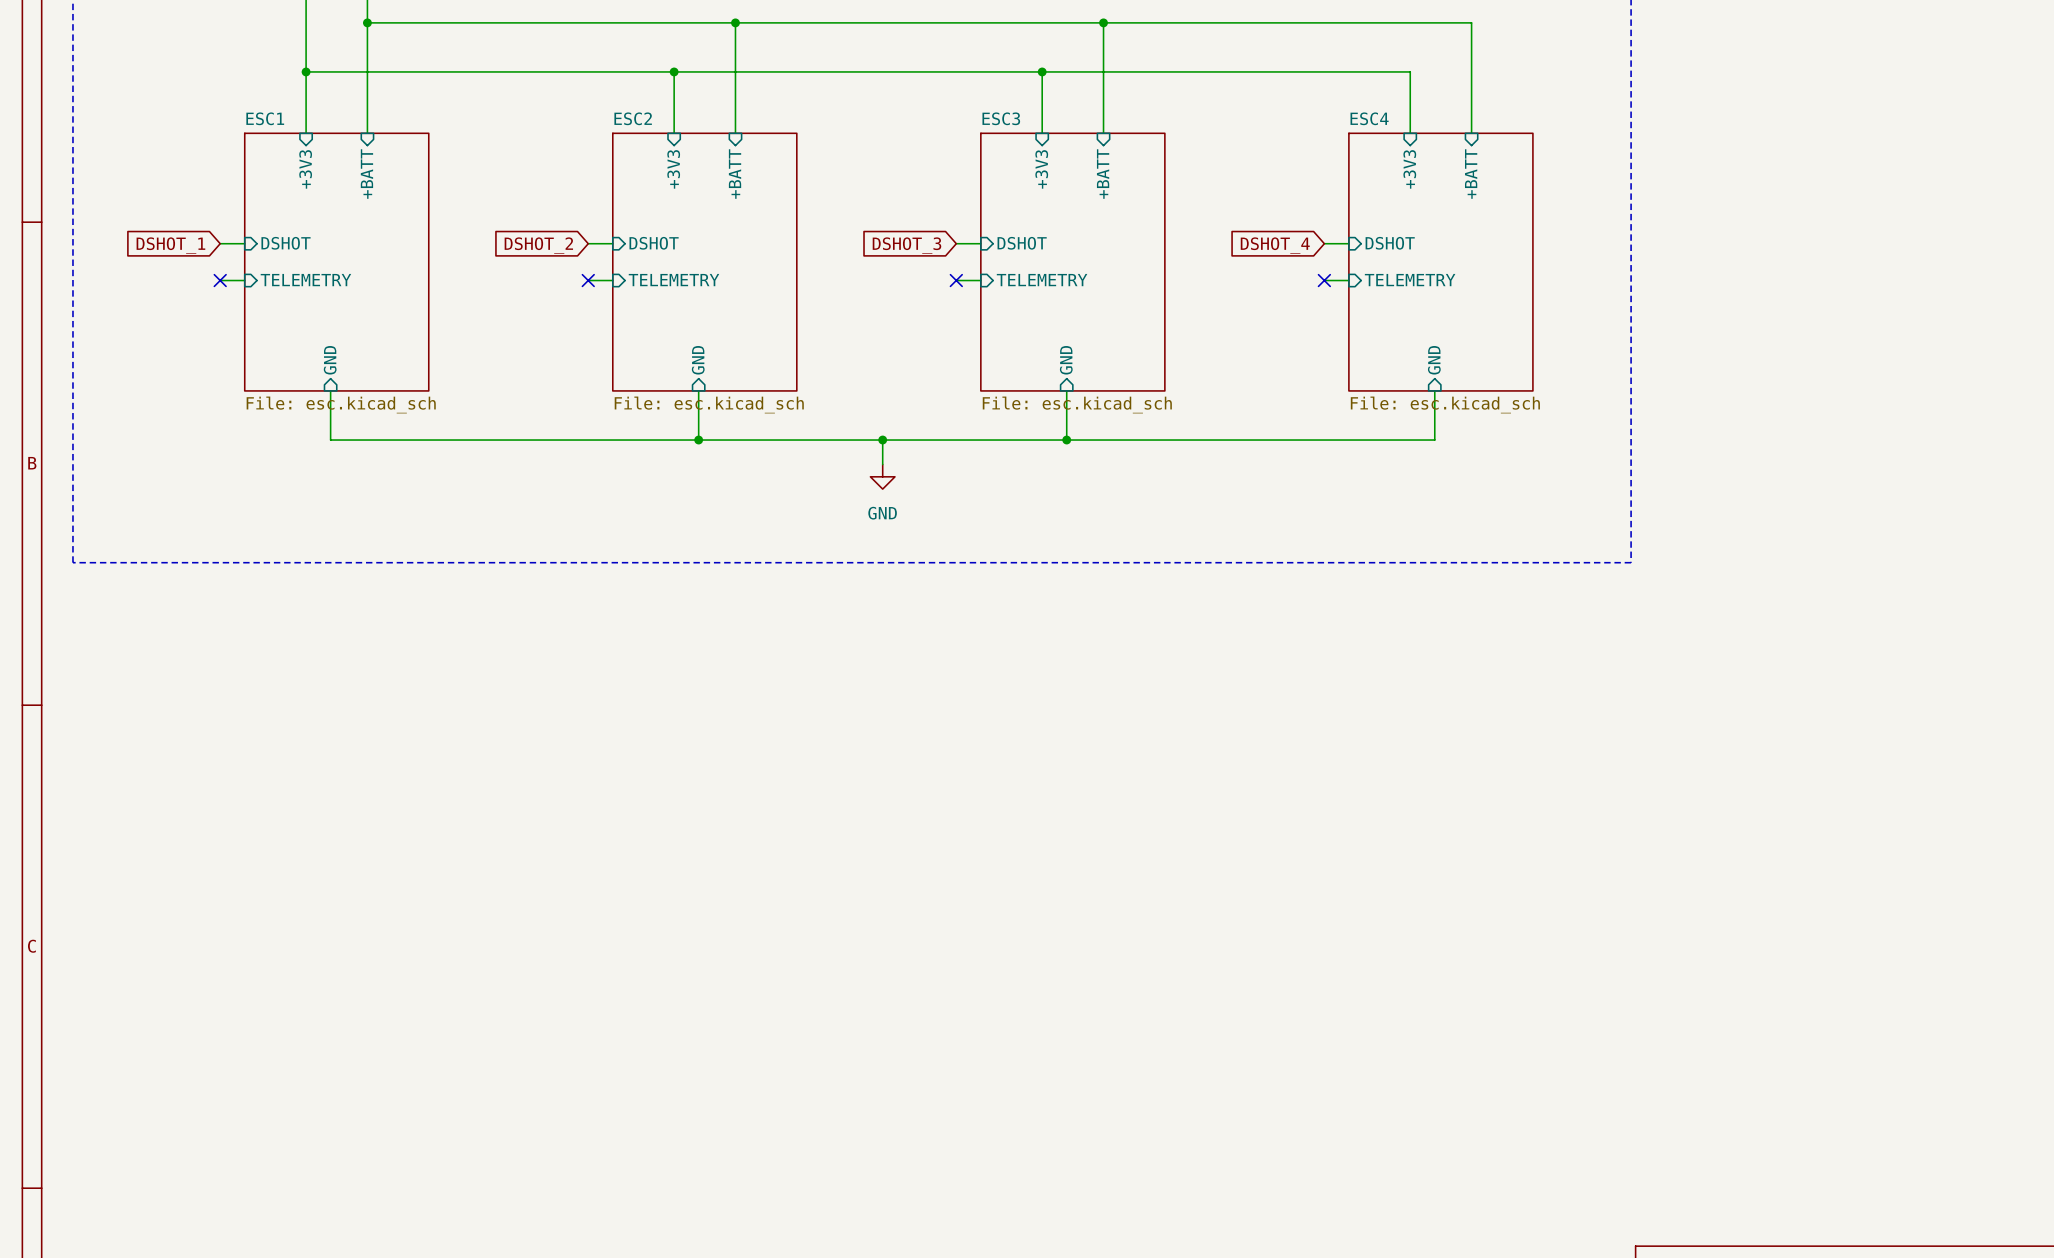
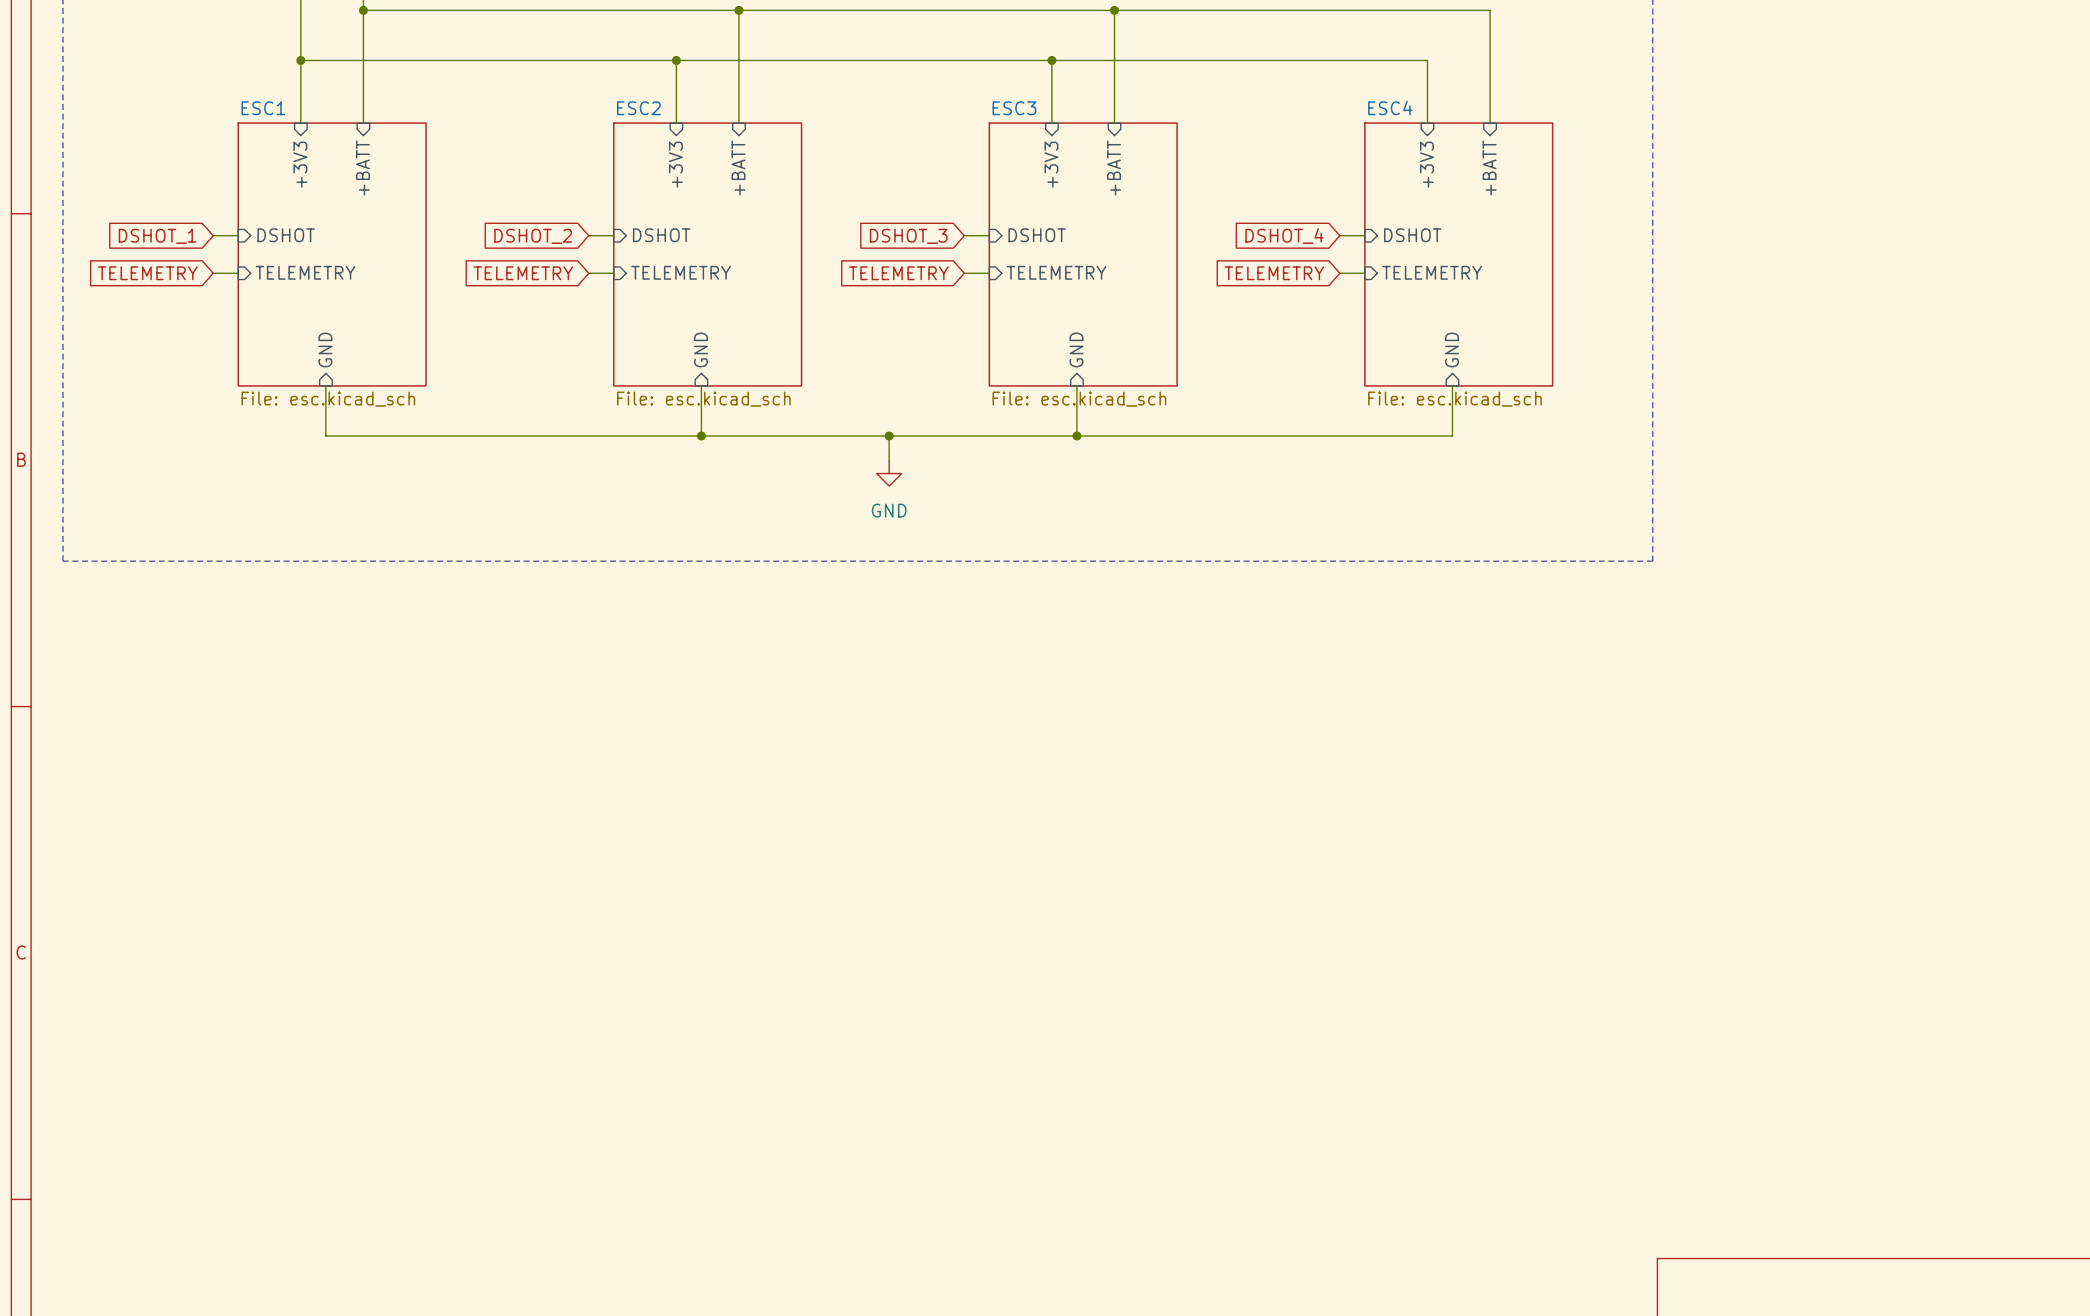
global label: none -> TELEMETRY (147, 273)
no-connect mark: (220, 280) -> none
global label: none -> TELEMETRY (523, 273)
no-connect mark: (588, 280) -> none
global label: none -> TELEMETRY (898, 273)
no-connect mark: (956, 280) -> none
global label: none -> TELEMETRY (1274, 273)
no-connect mark: (1324, 280) -> none

